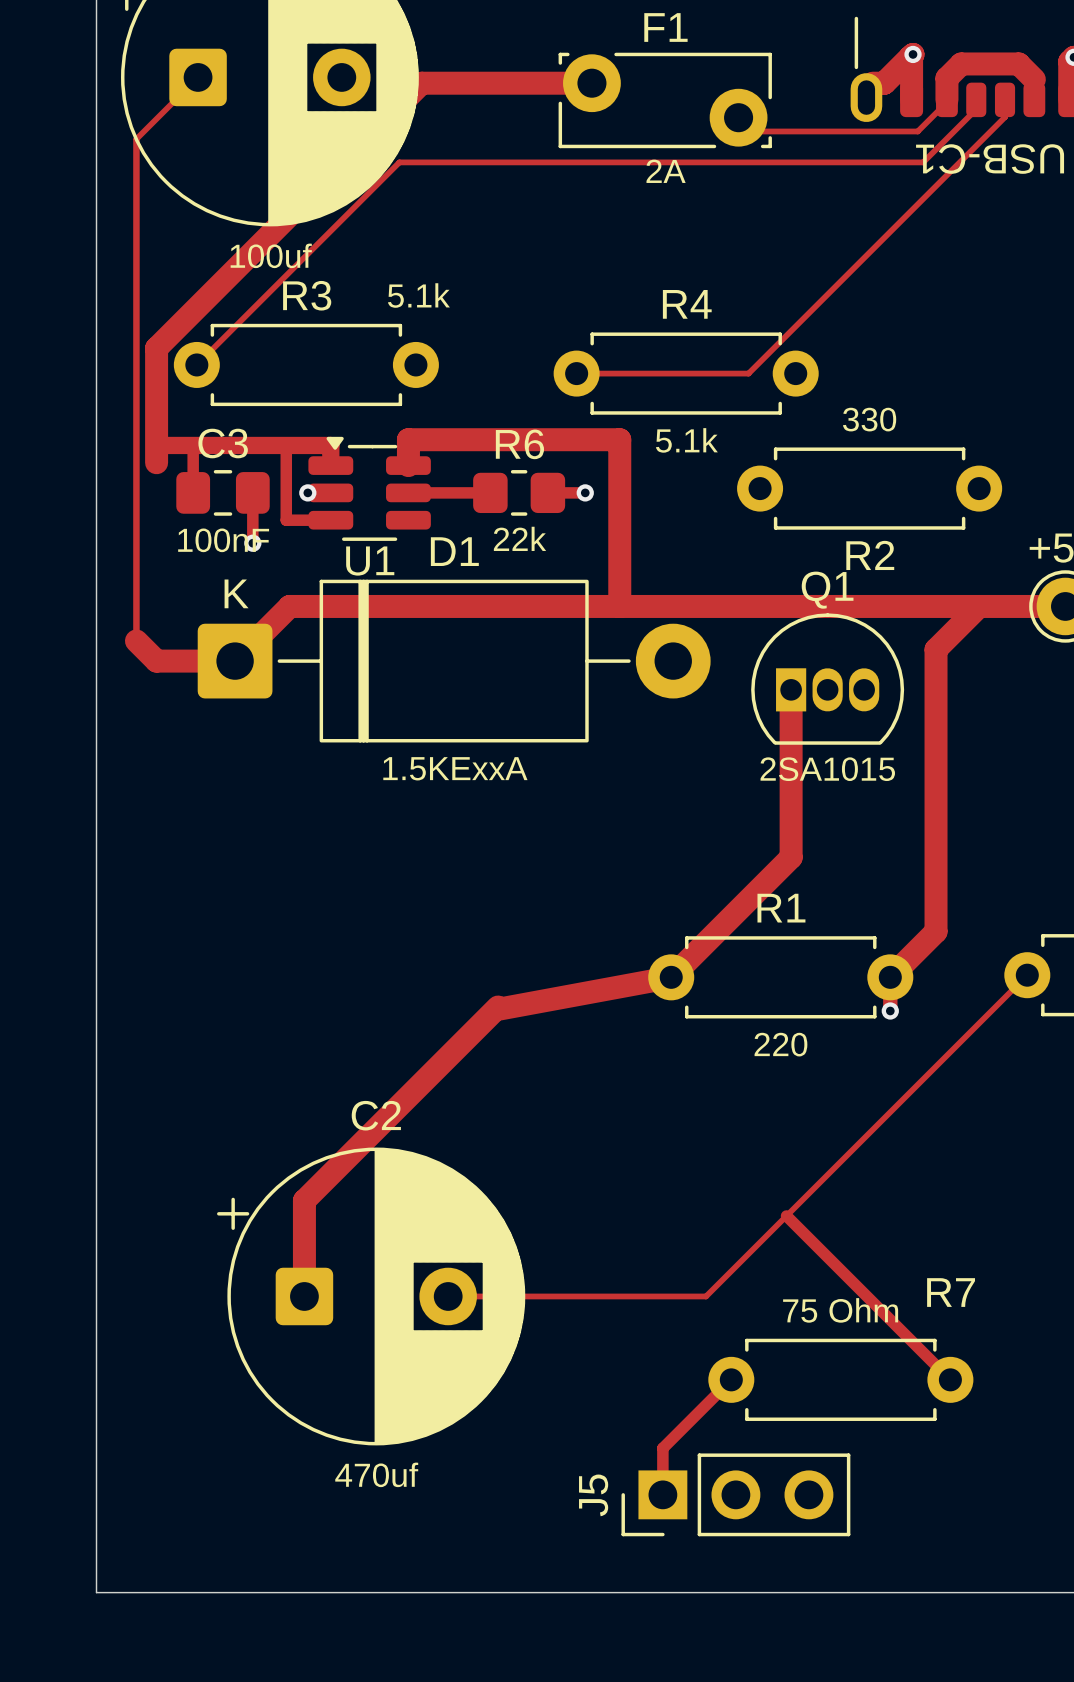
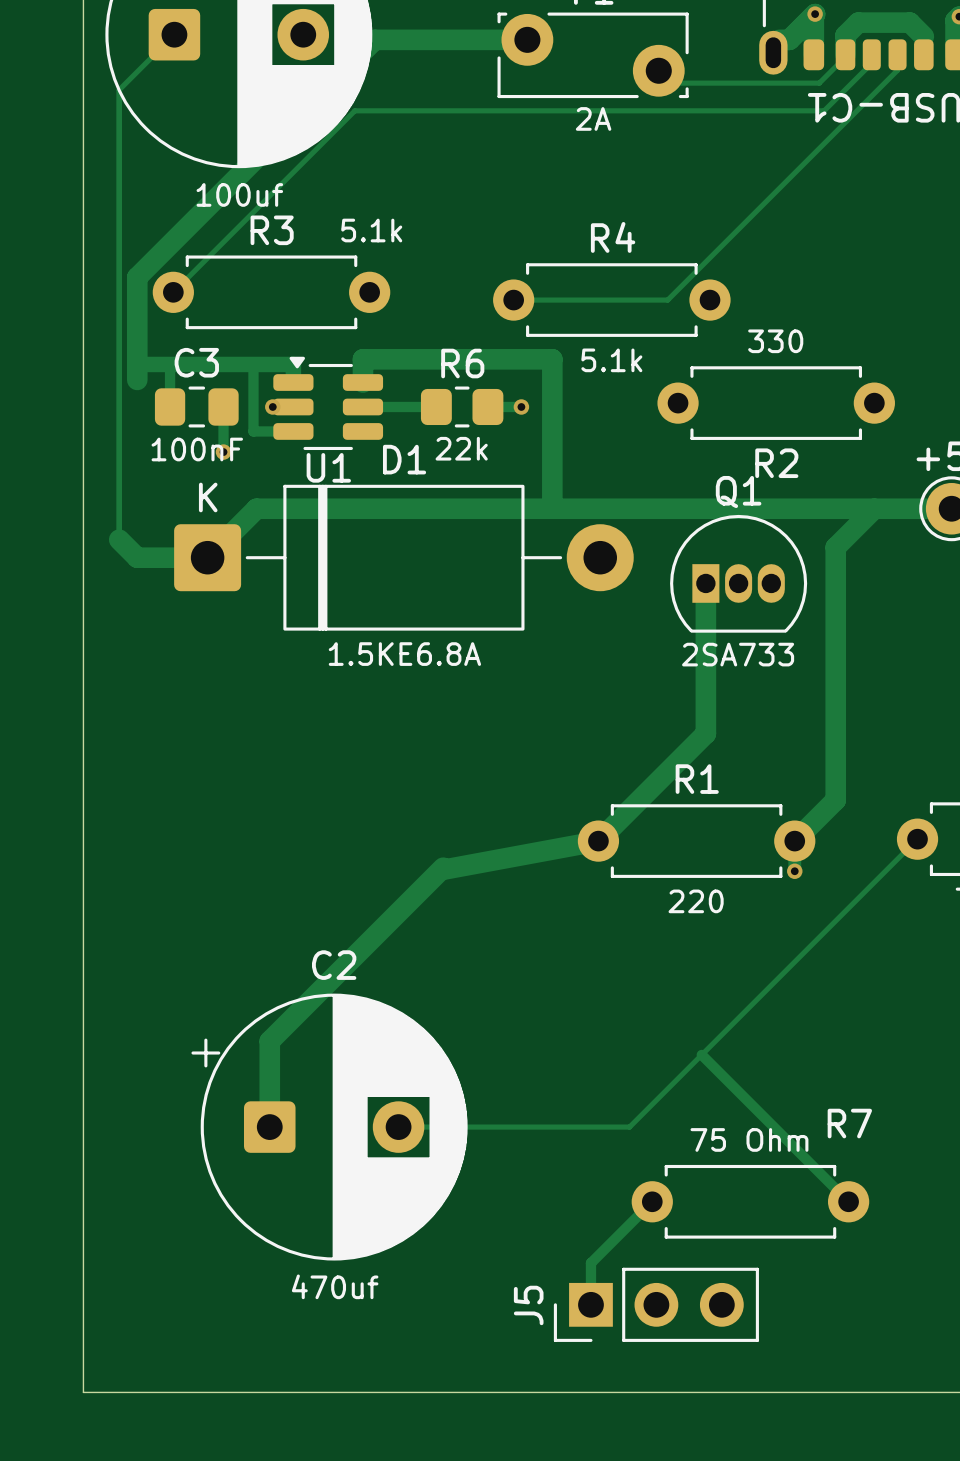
D1 value: 1.5KExxA (455, 768) -> 1.5KE6.8A (404, 654)
Q1 value: 2SA1015 (827, 769) -> 2SA733 (738, 654)

